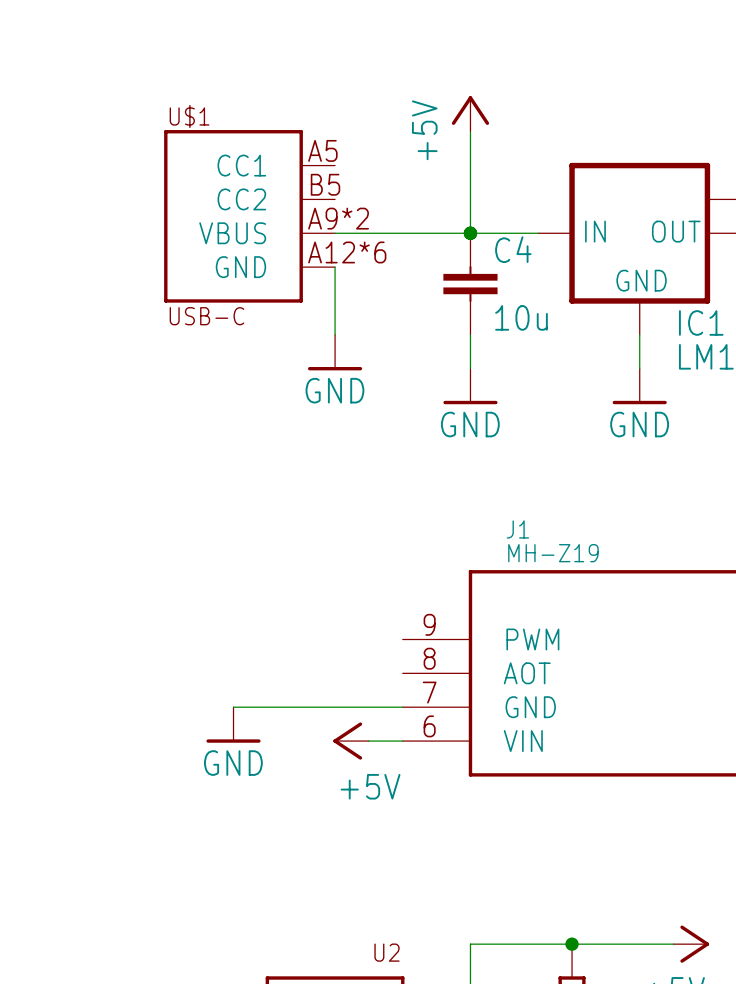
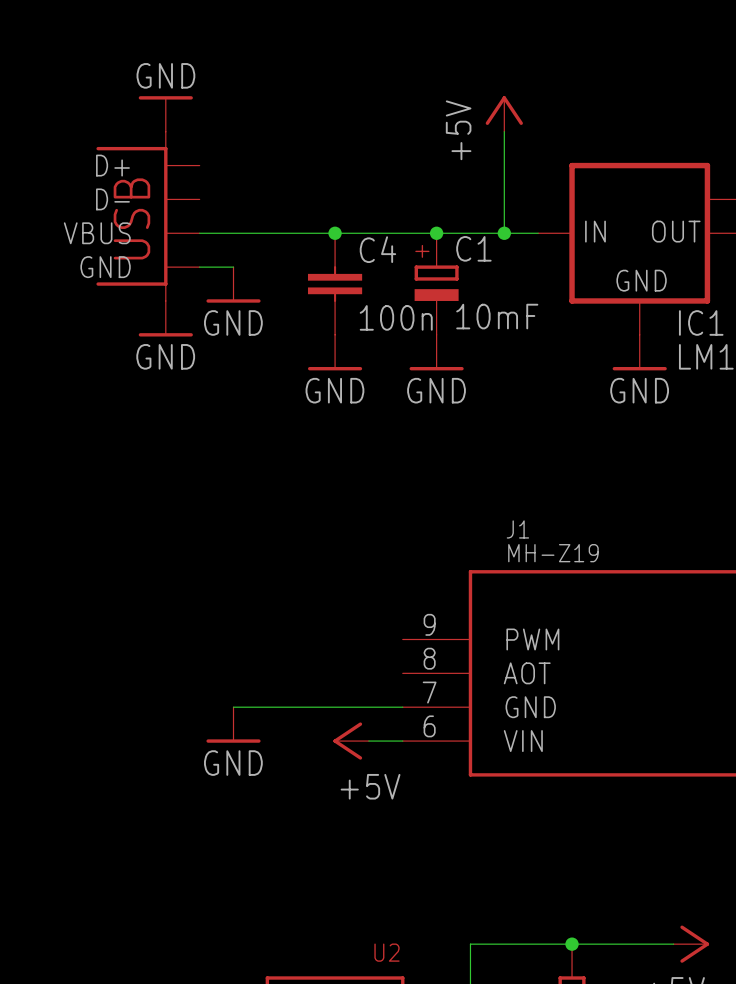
power symbol: none -> GND (165, 113)
power symbol position: +5V (470, 113) -> +5V (504, 113)
wire: (470, 131) (470, 233) -> (504, 131) (504, 233)
part: none -> (148, 216)
U$1: USB-C (249, 216) -> none
wire: none -> (199, 233) (335, 233)
junction: none -> (335, 233)
junction: none -> (436, 233)
junction: (470, 233) -> none
junction: none -> (504, 233)
wire: none -> (199, 267) (233, 267)
power symbol: none -> GND (233, 284)
C1: none -> 10mF (436, 284)
C4 position: (470, 284) -> (335, 284)
C4 value: 10u (521, 317) -> 100n (396, 317)
power symbol: none -> GND (165, 318)
wire: (470, 334) (470, 368) -> none
power symbol position: GND (470, 386) -> GND (436, 352)
power symbol position: GND (639, 386) -> GND (639, 352)

